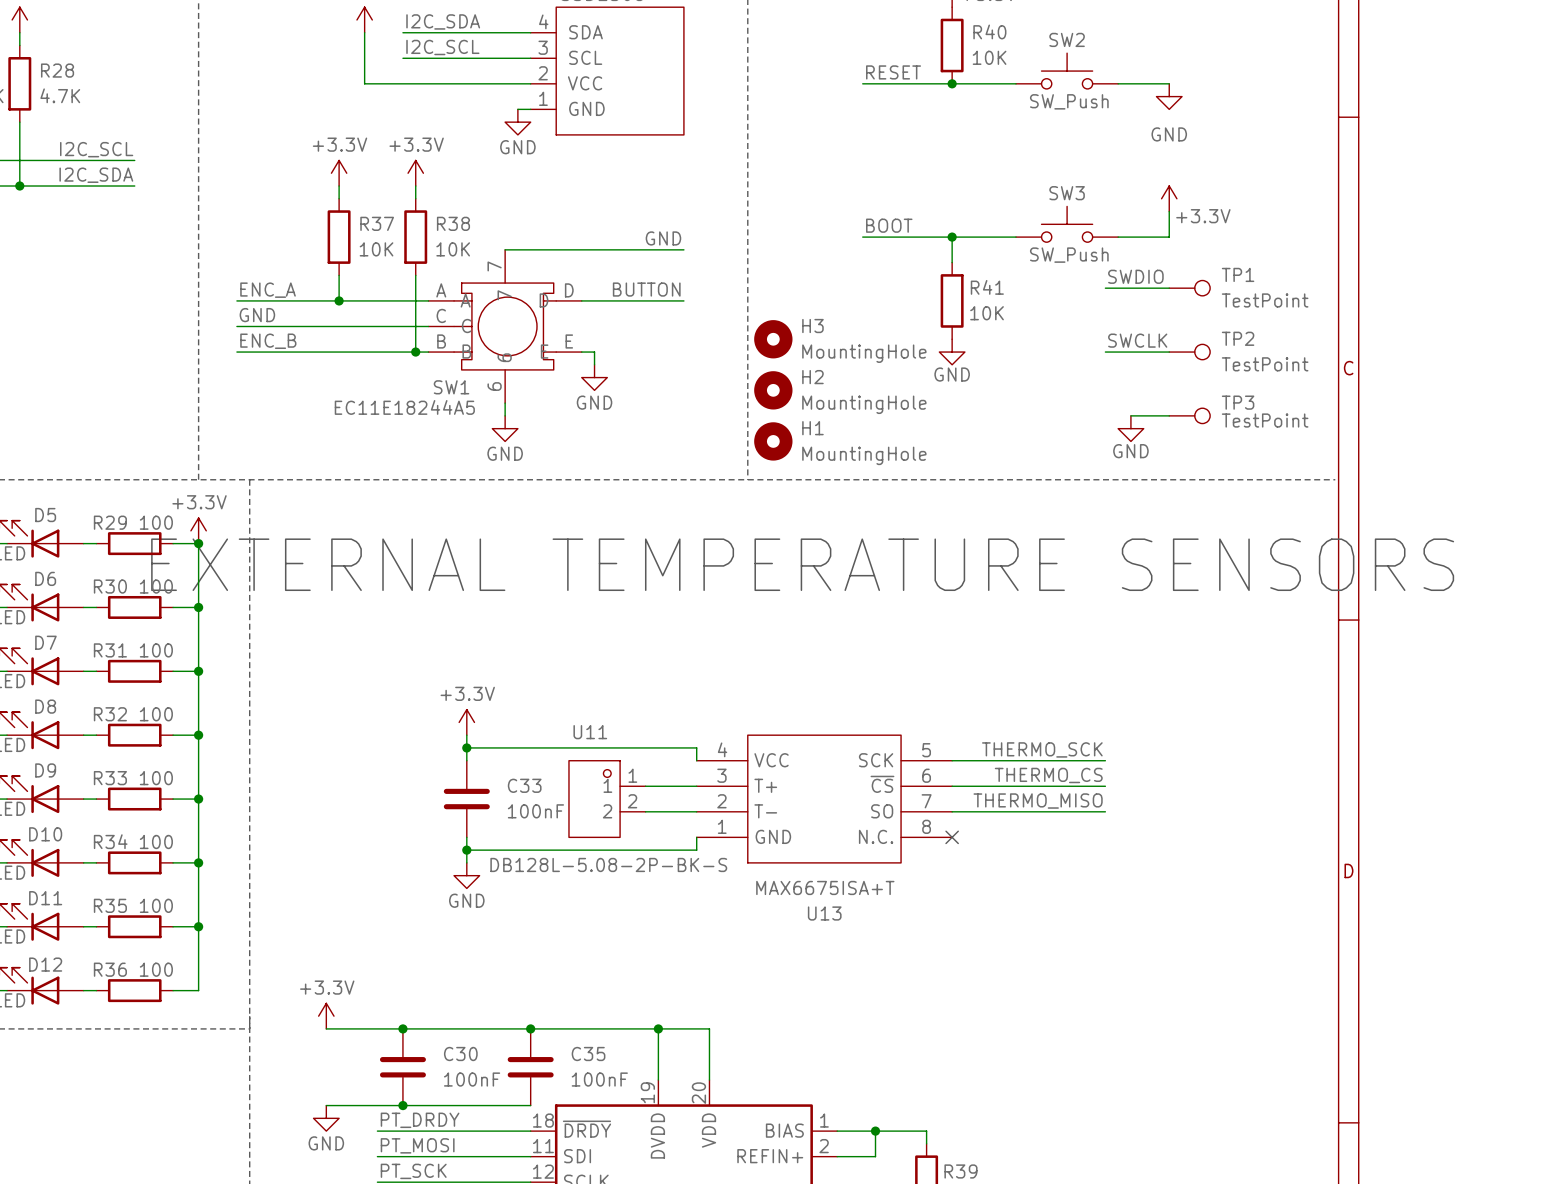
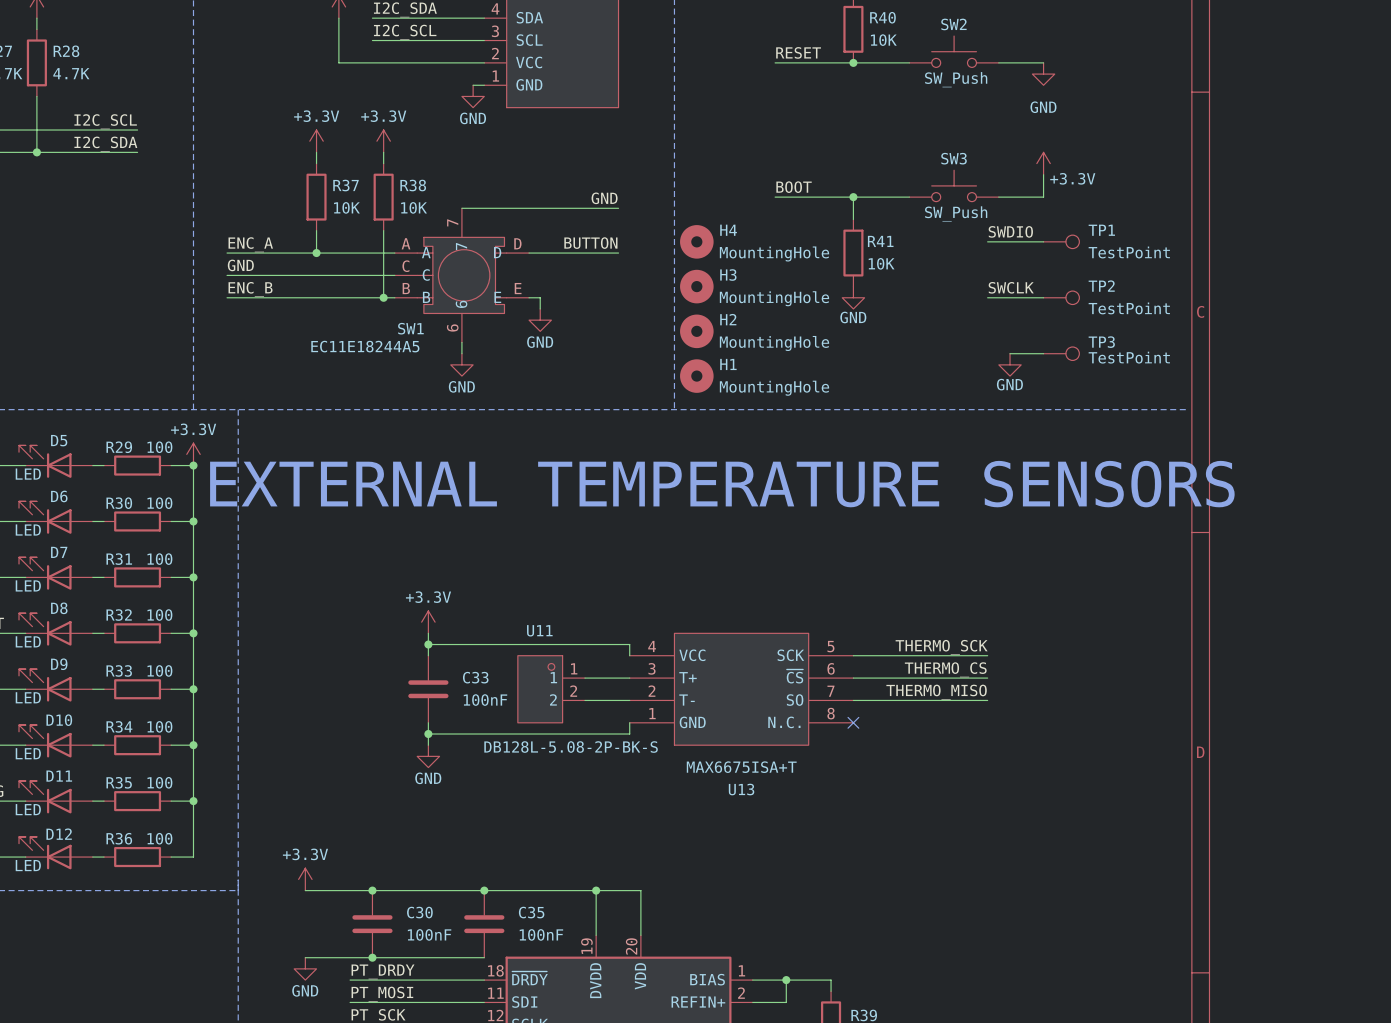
H4: none -> MountingHole (696, 241)

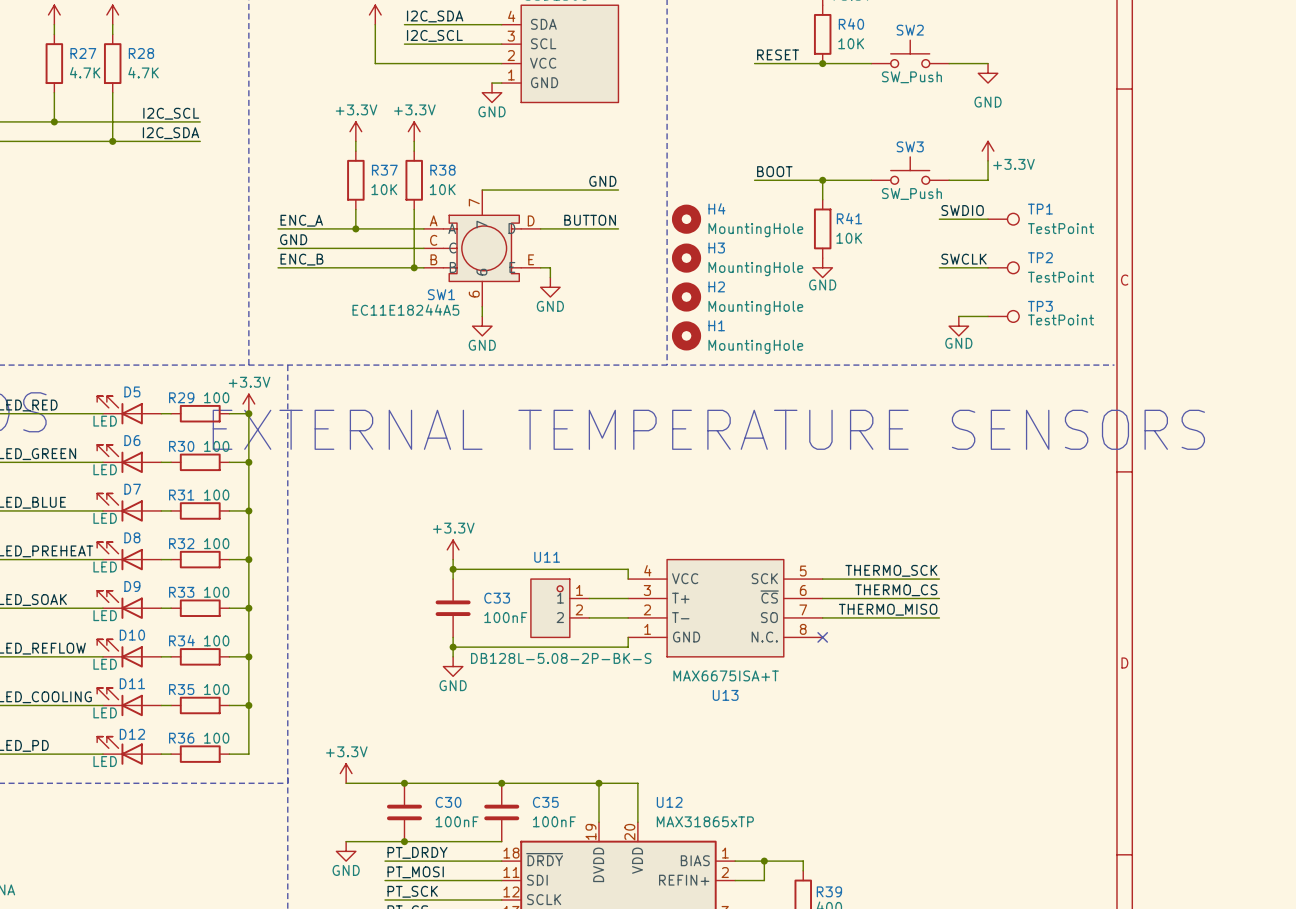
U12 name: none -> U12 (669, 802)
U12 value: none -> MAX31865xTP (705, 821)

